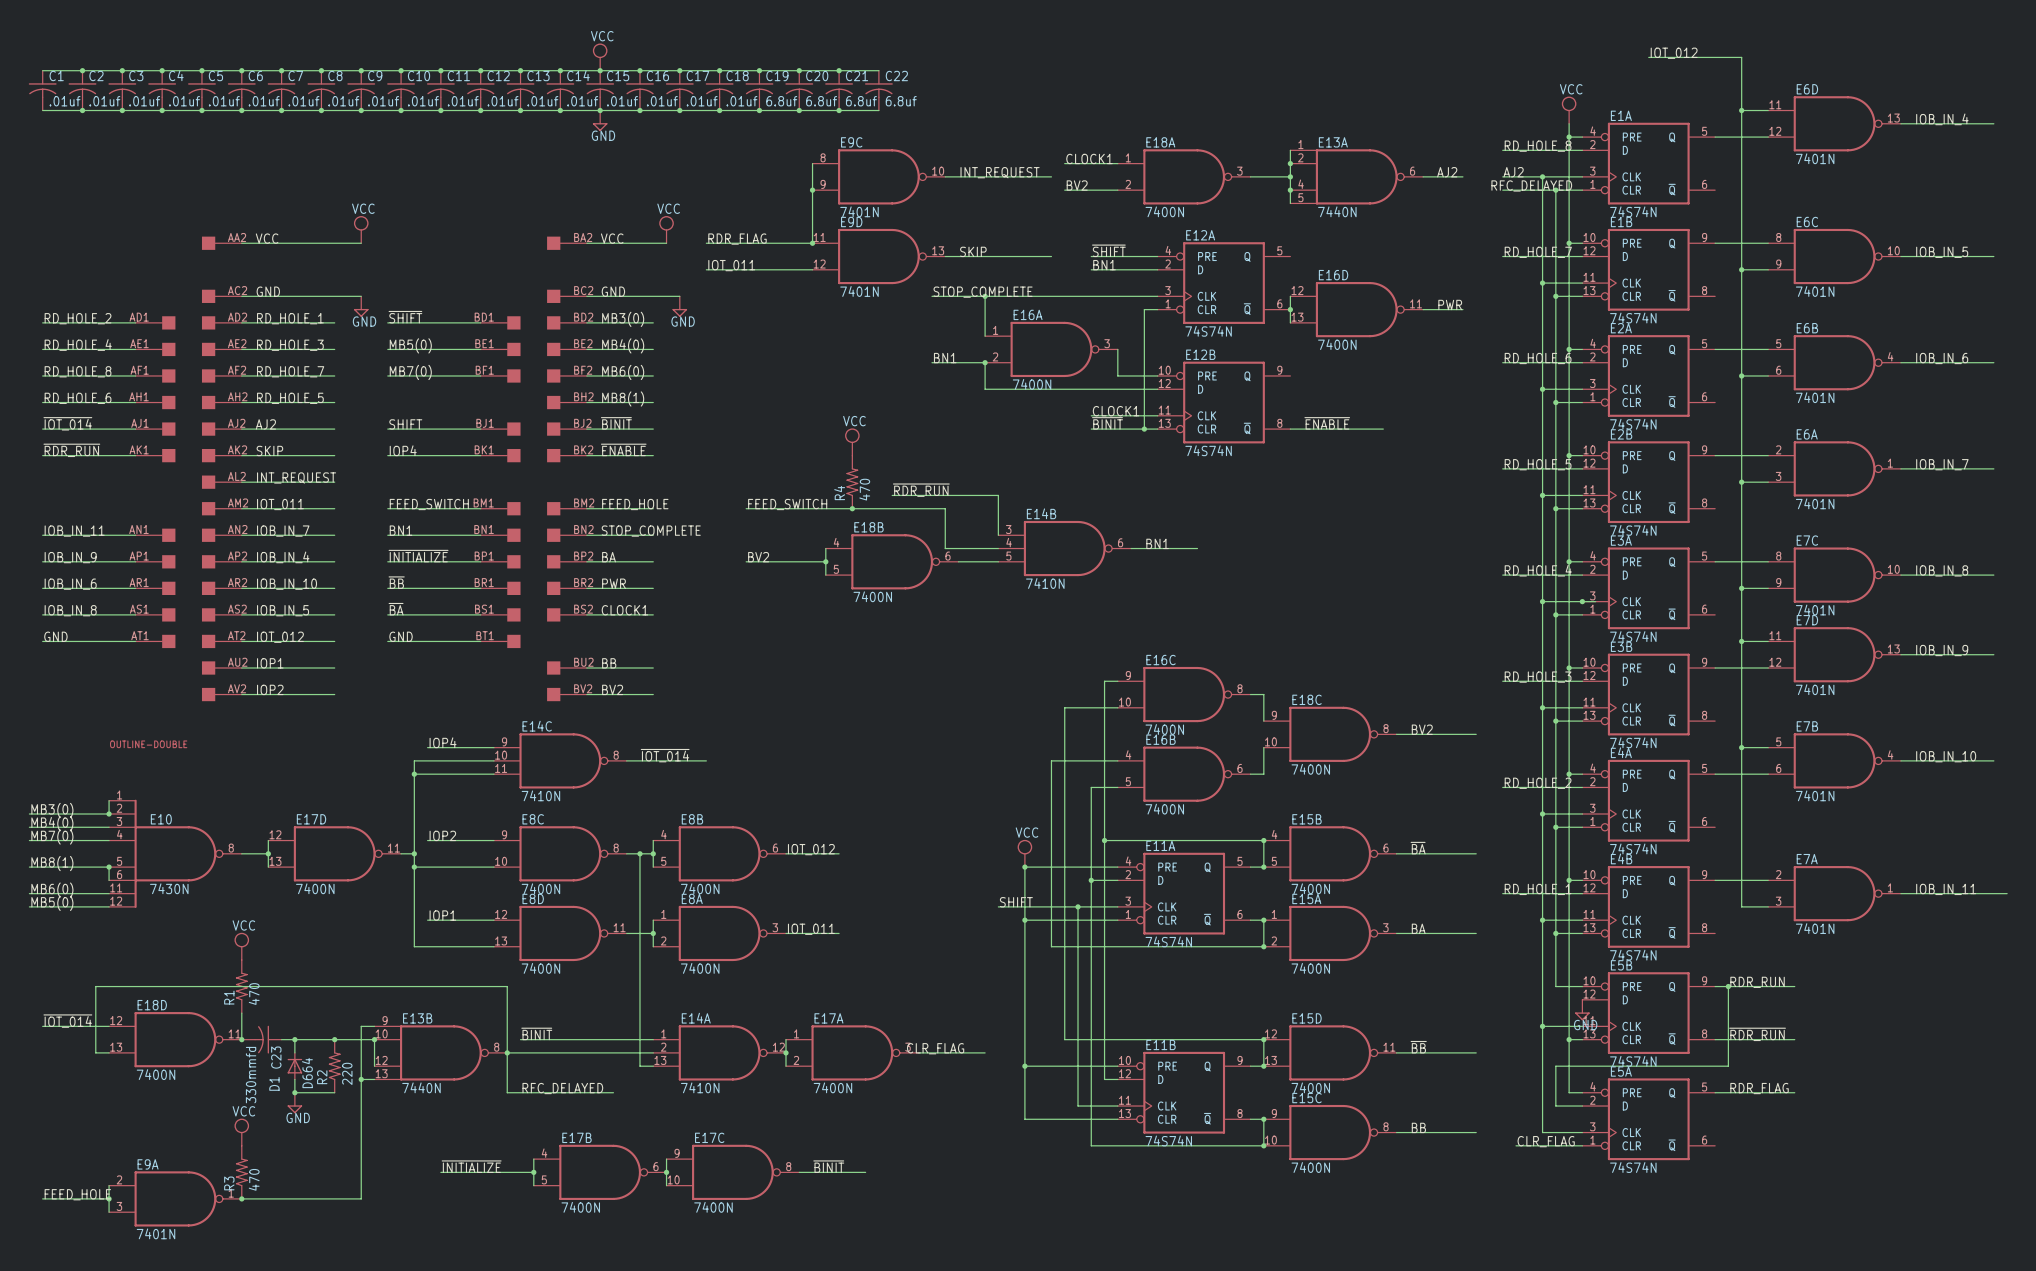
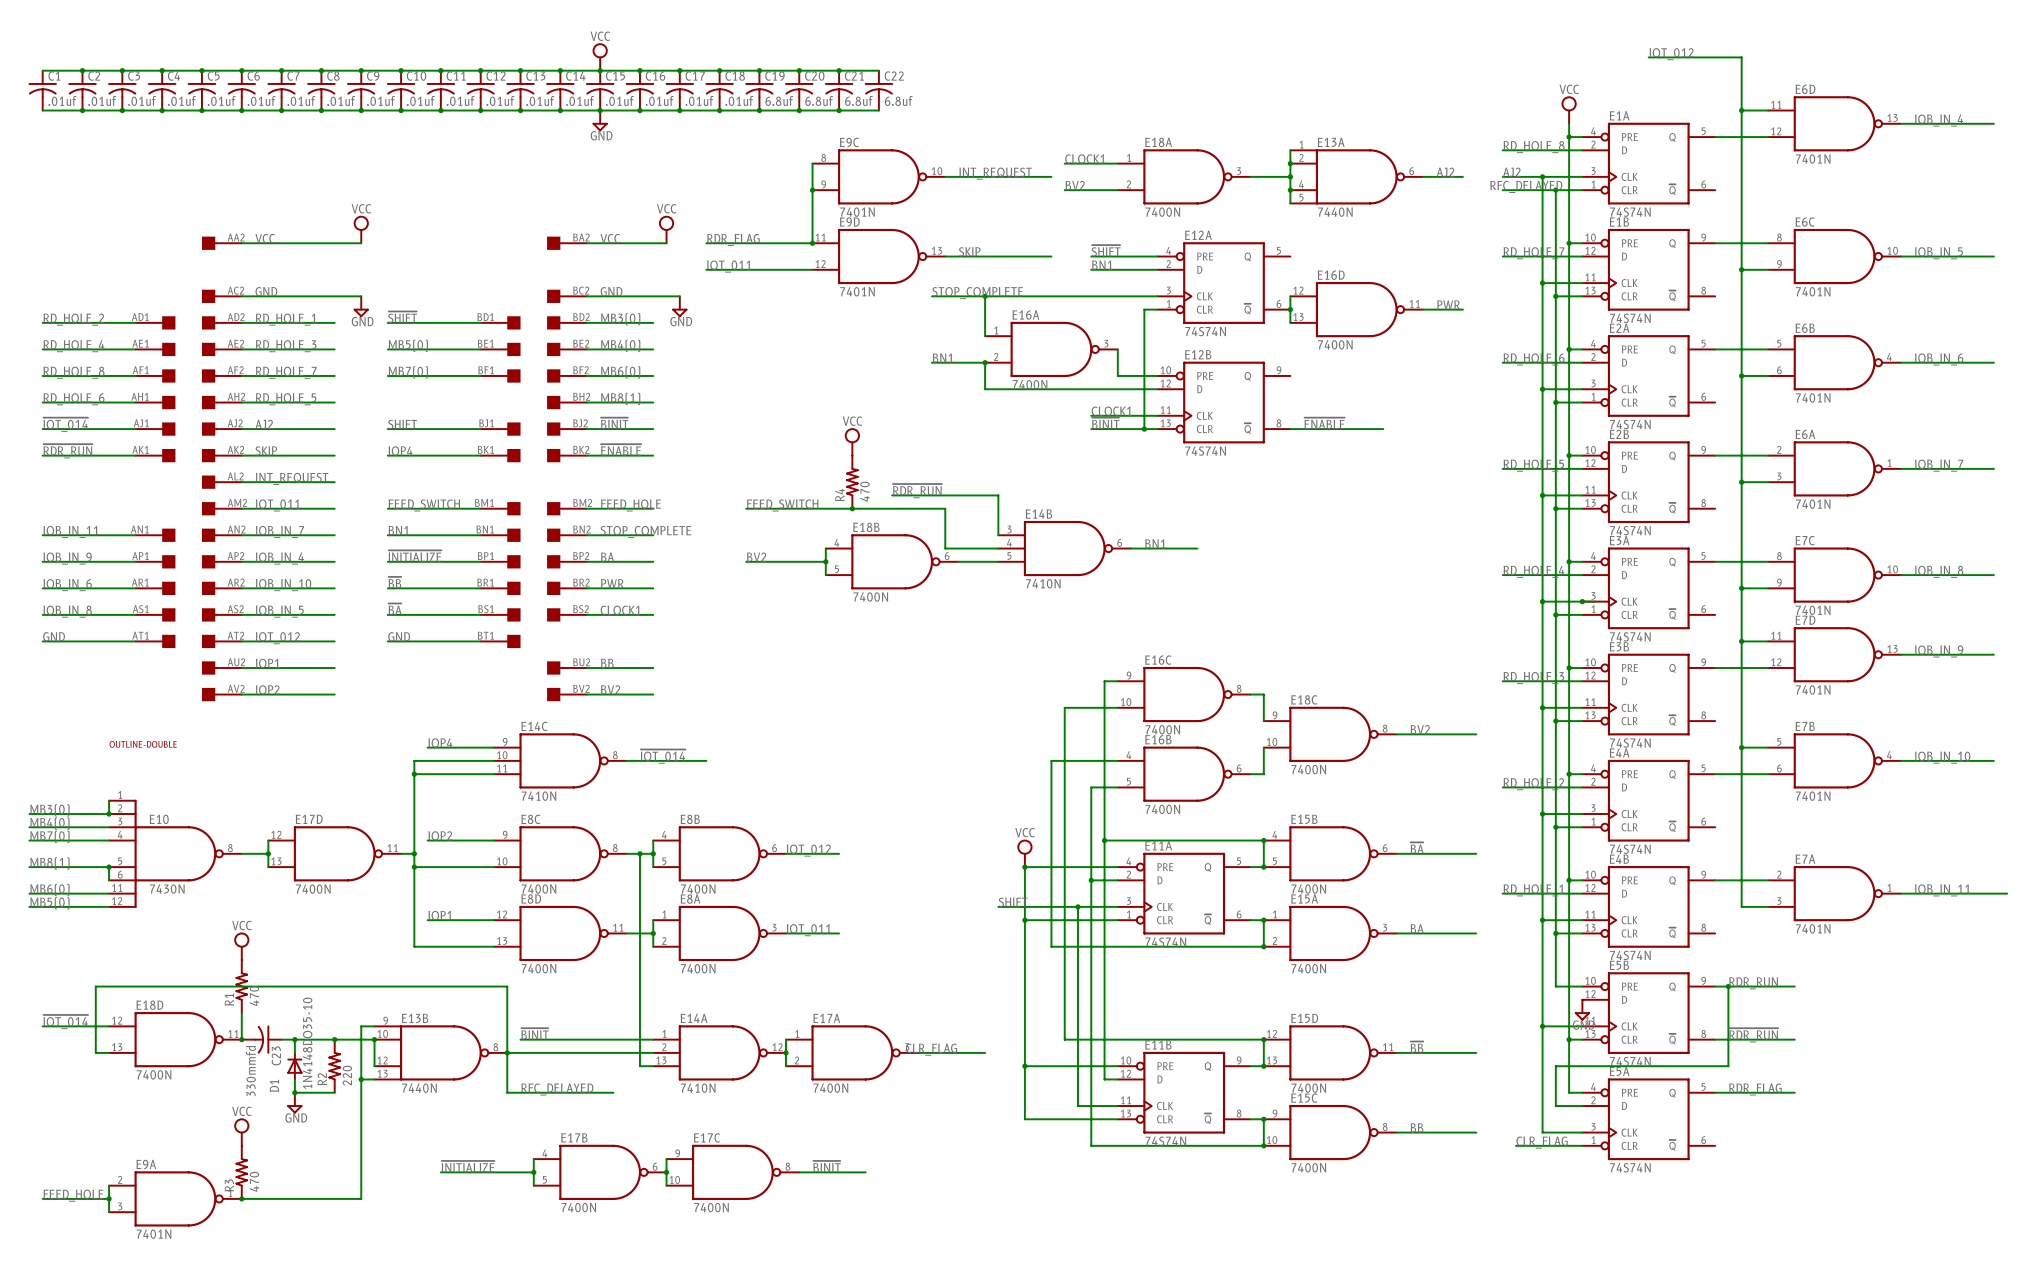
D1 value: D664 (307, 1073) -> 1N4148DO35-10 (307, 1043)

